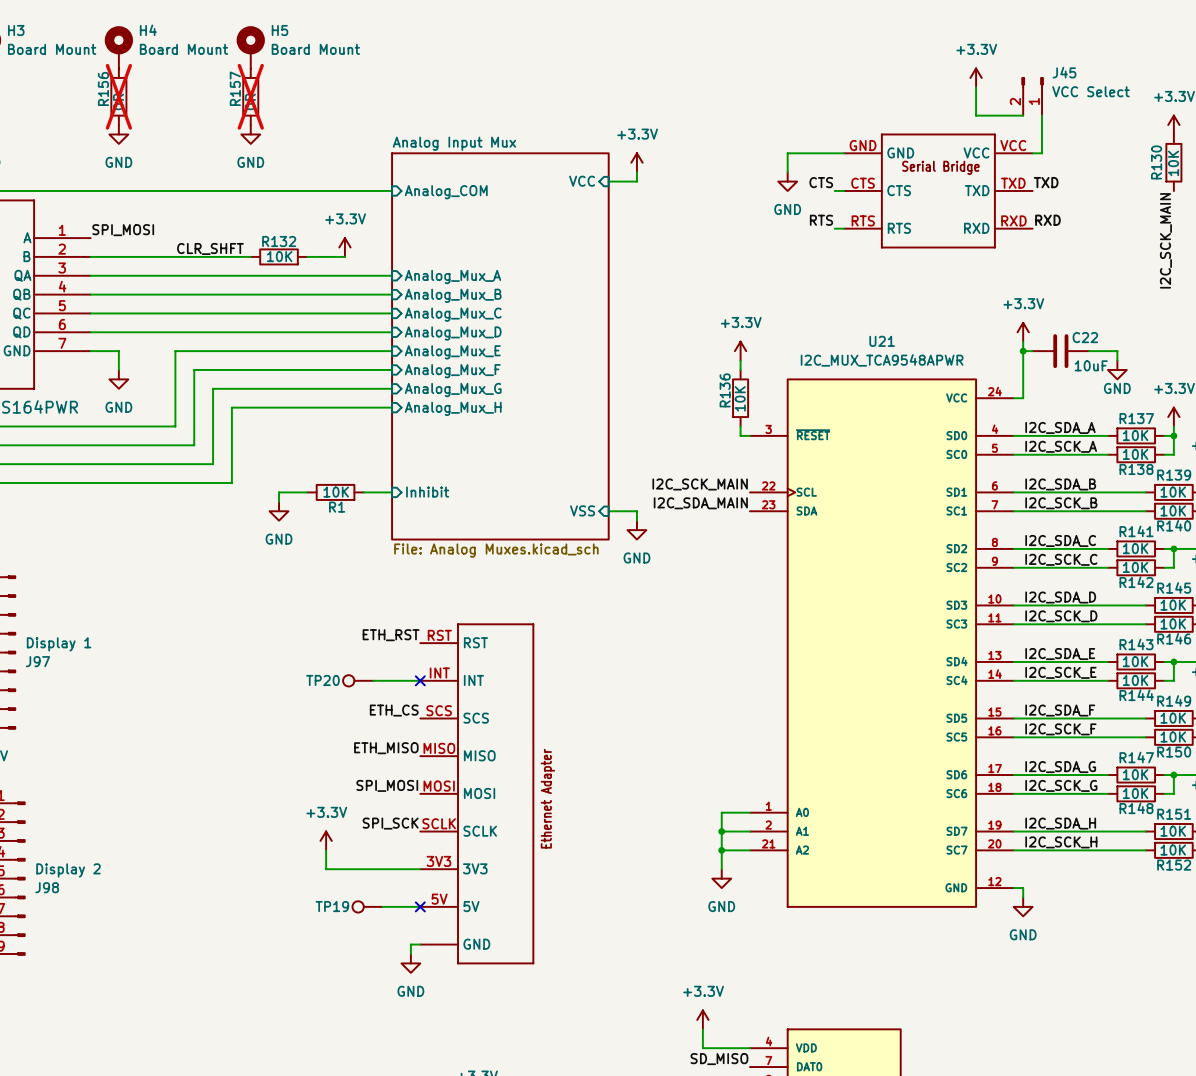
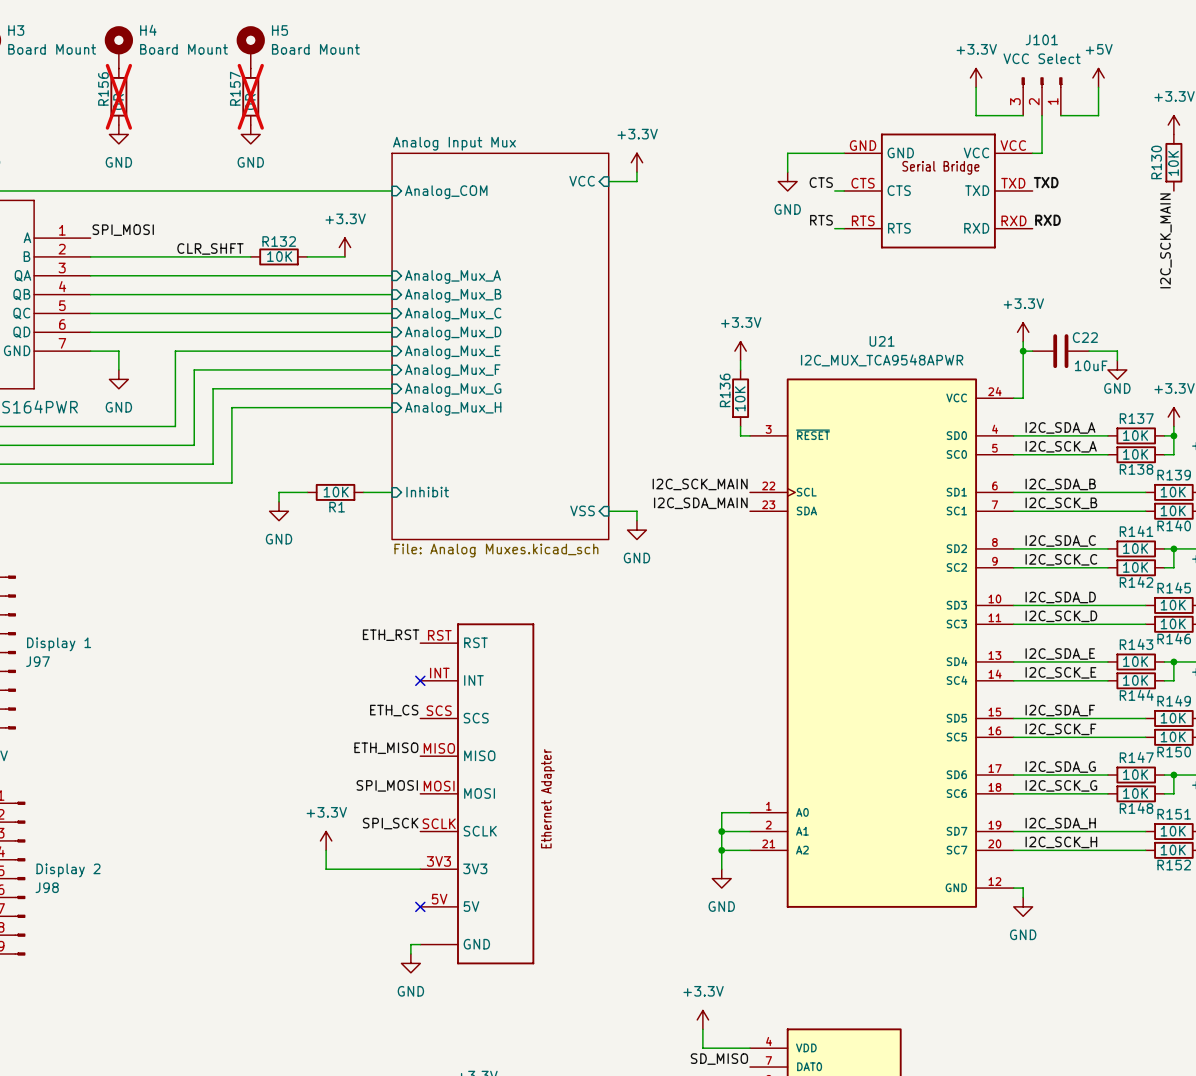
power symbol: none -> +5V (1098, 77)
wire: none -> (1098, 87) (1098, 115) (1060, 115)
J45: VCC Select (1032, 96) -> none
J101: none -> VCC Select (1042, 96)
TP20: (358, 680) -> none
wire: (373, 680) (420, 680) -> none
TP19: (367, 906) -> none
wire: (382, 906) (420, 906) -> none

